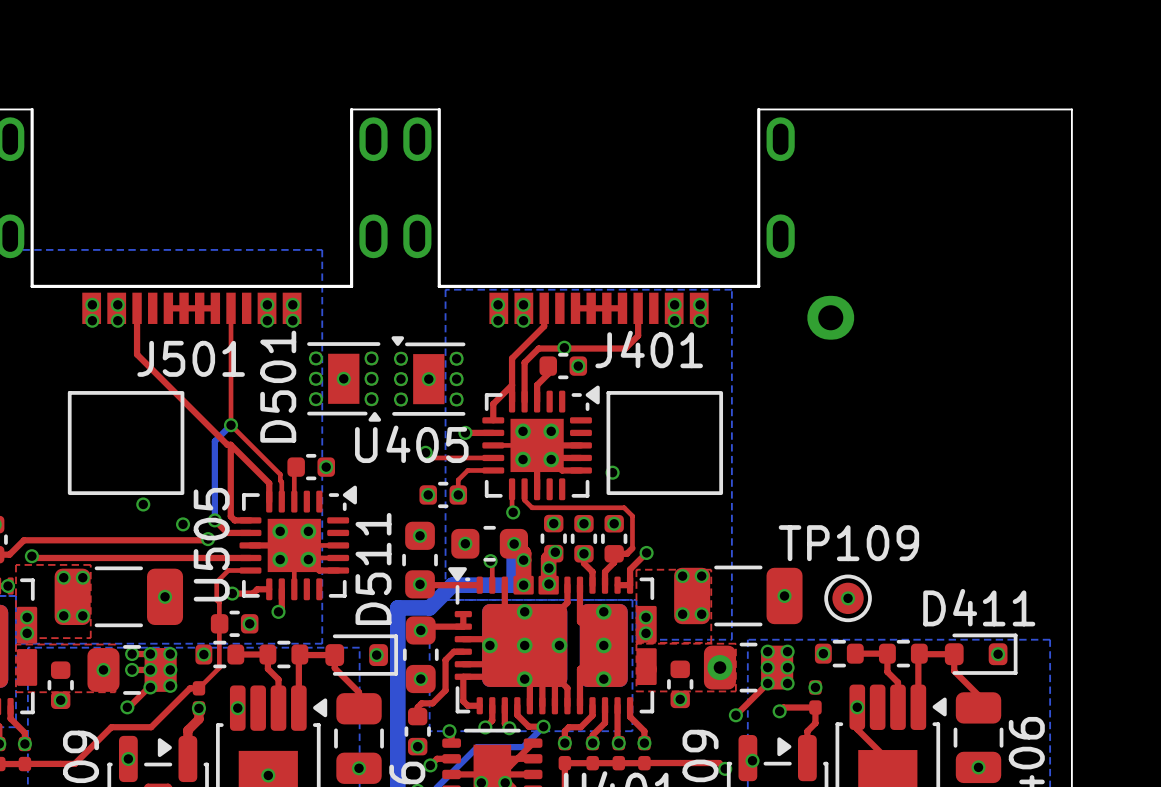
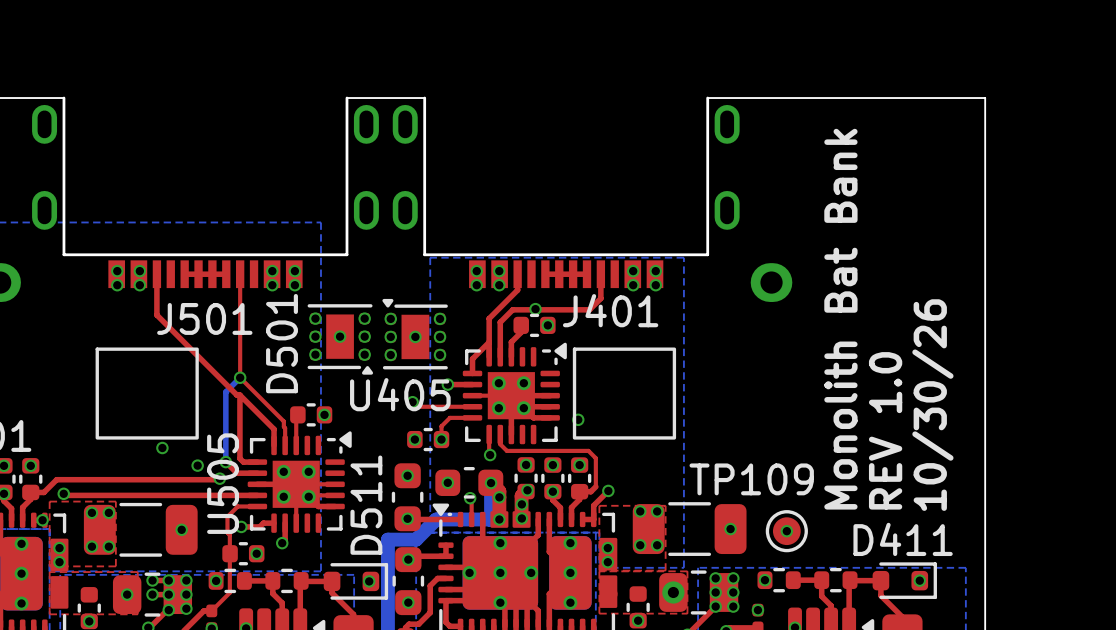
text: none -> Monolith Bat Bank (840, 319)
text: none -> 10/30/26 (932, 405)
text: none -> REV 1.0 (885, 430)
TP109 name position: TP109 (848, 543) -> TP109 (751, 479)

